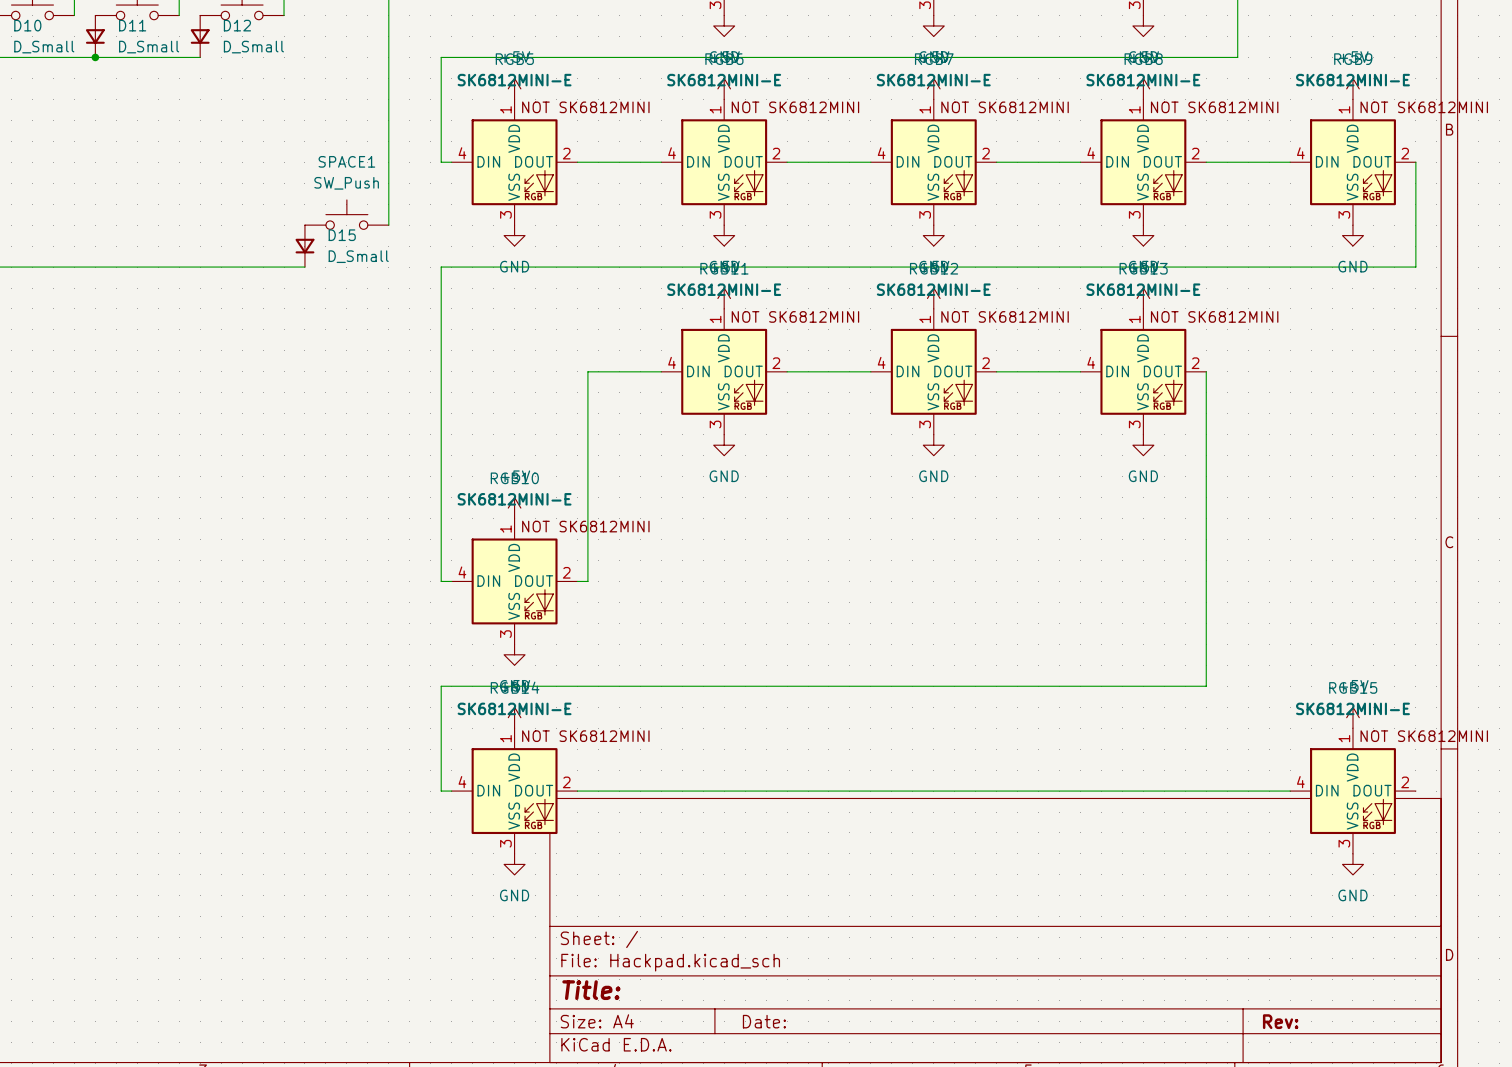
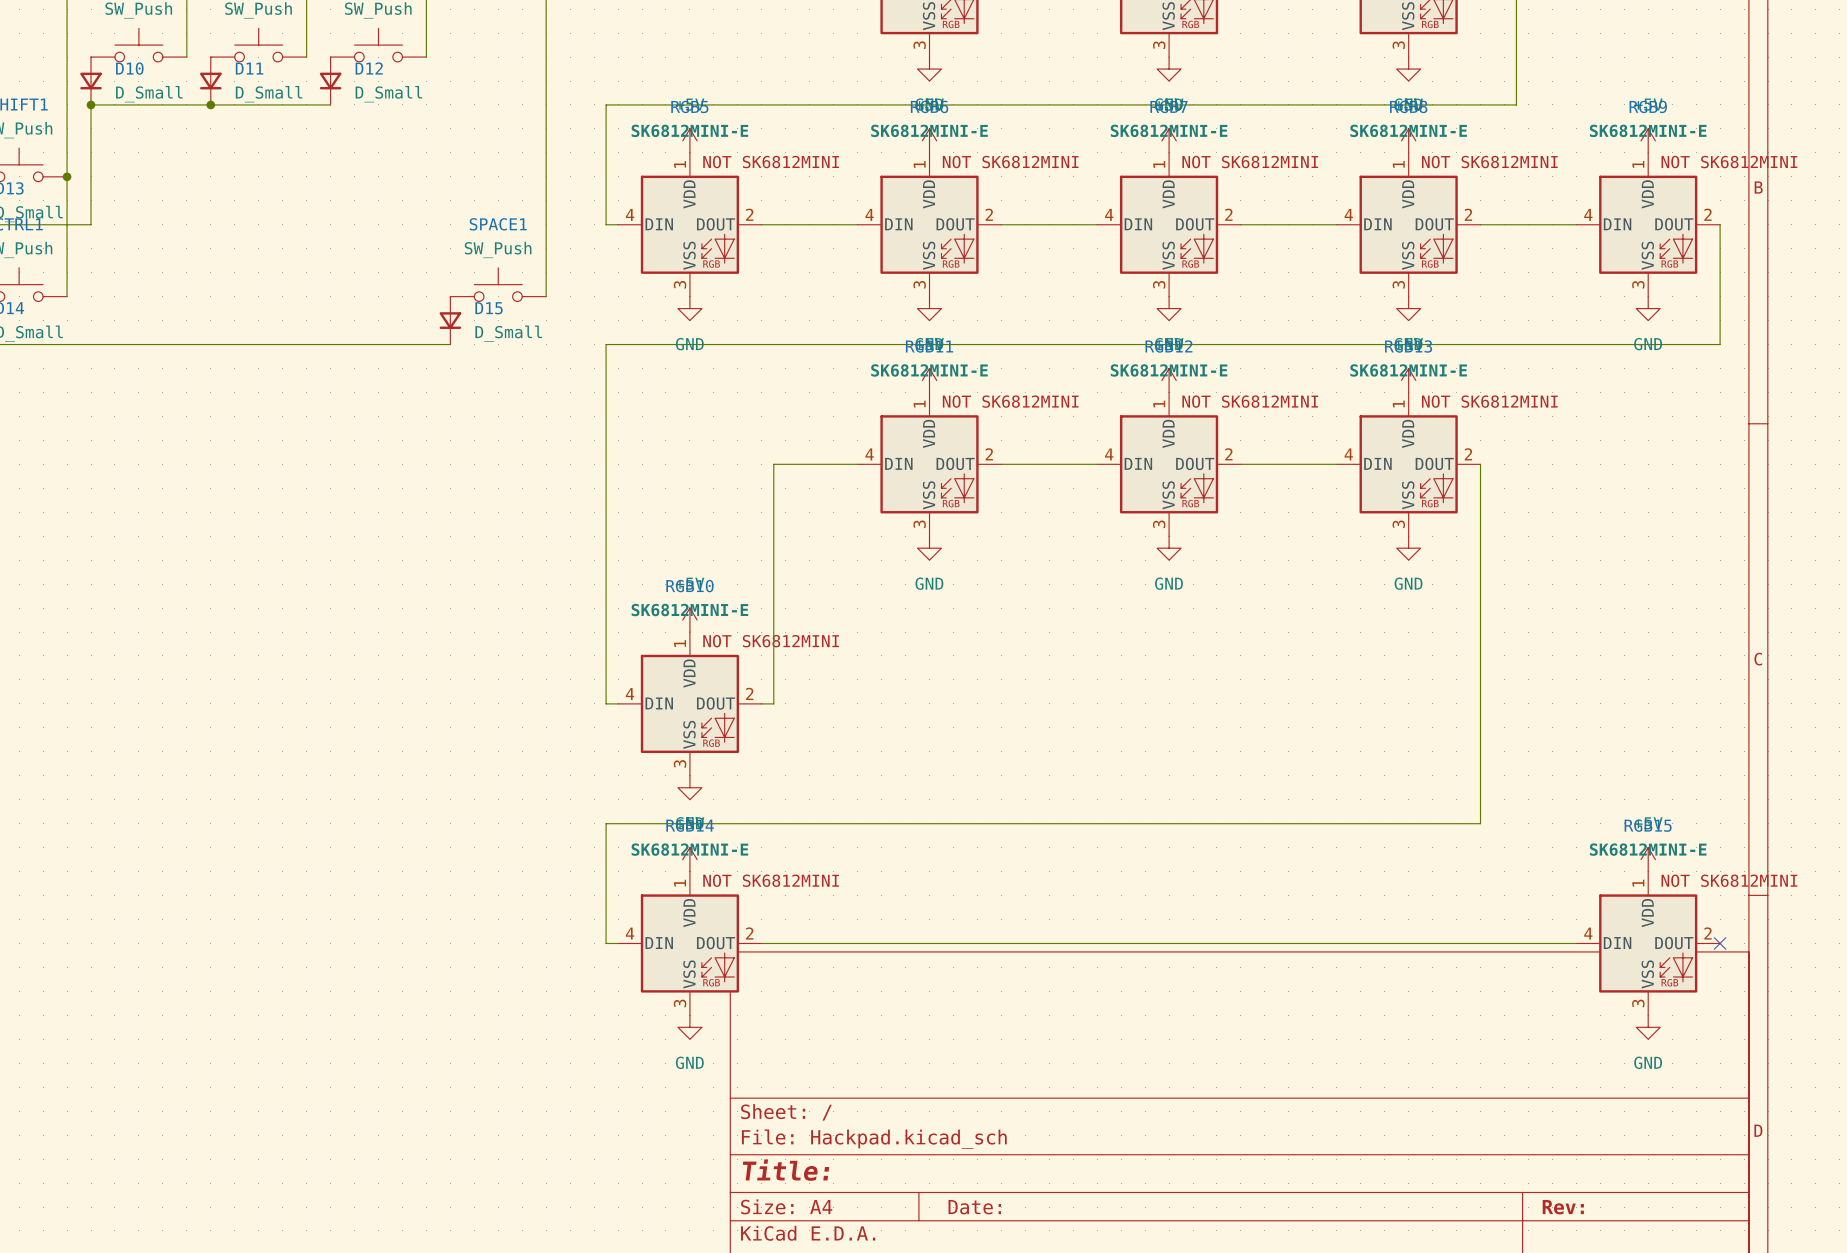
no-connect mark: none -> (1720, 943)

